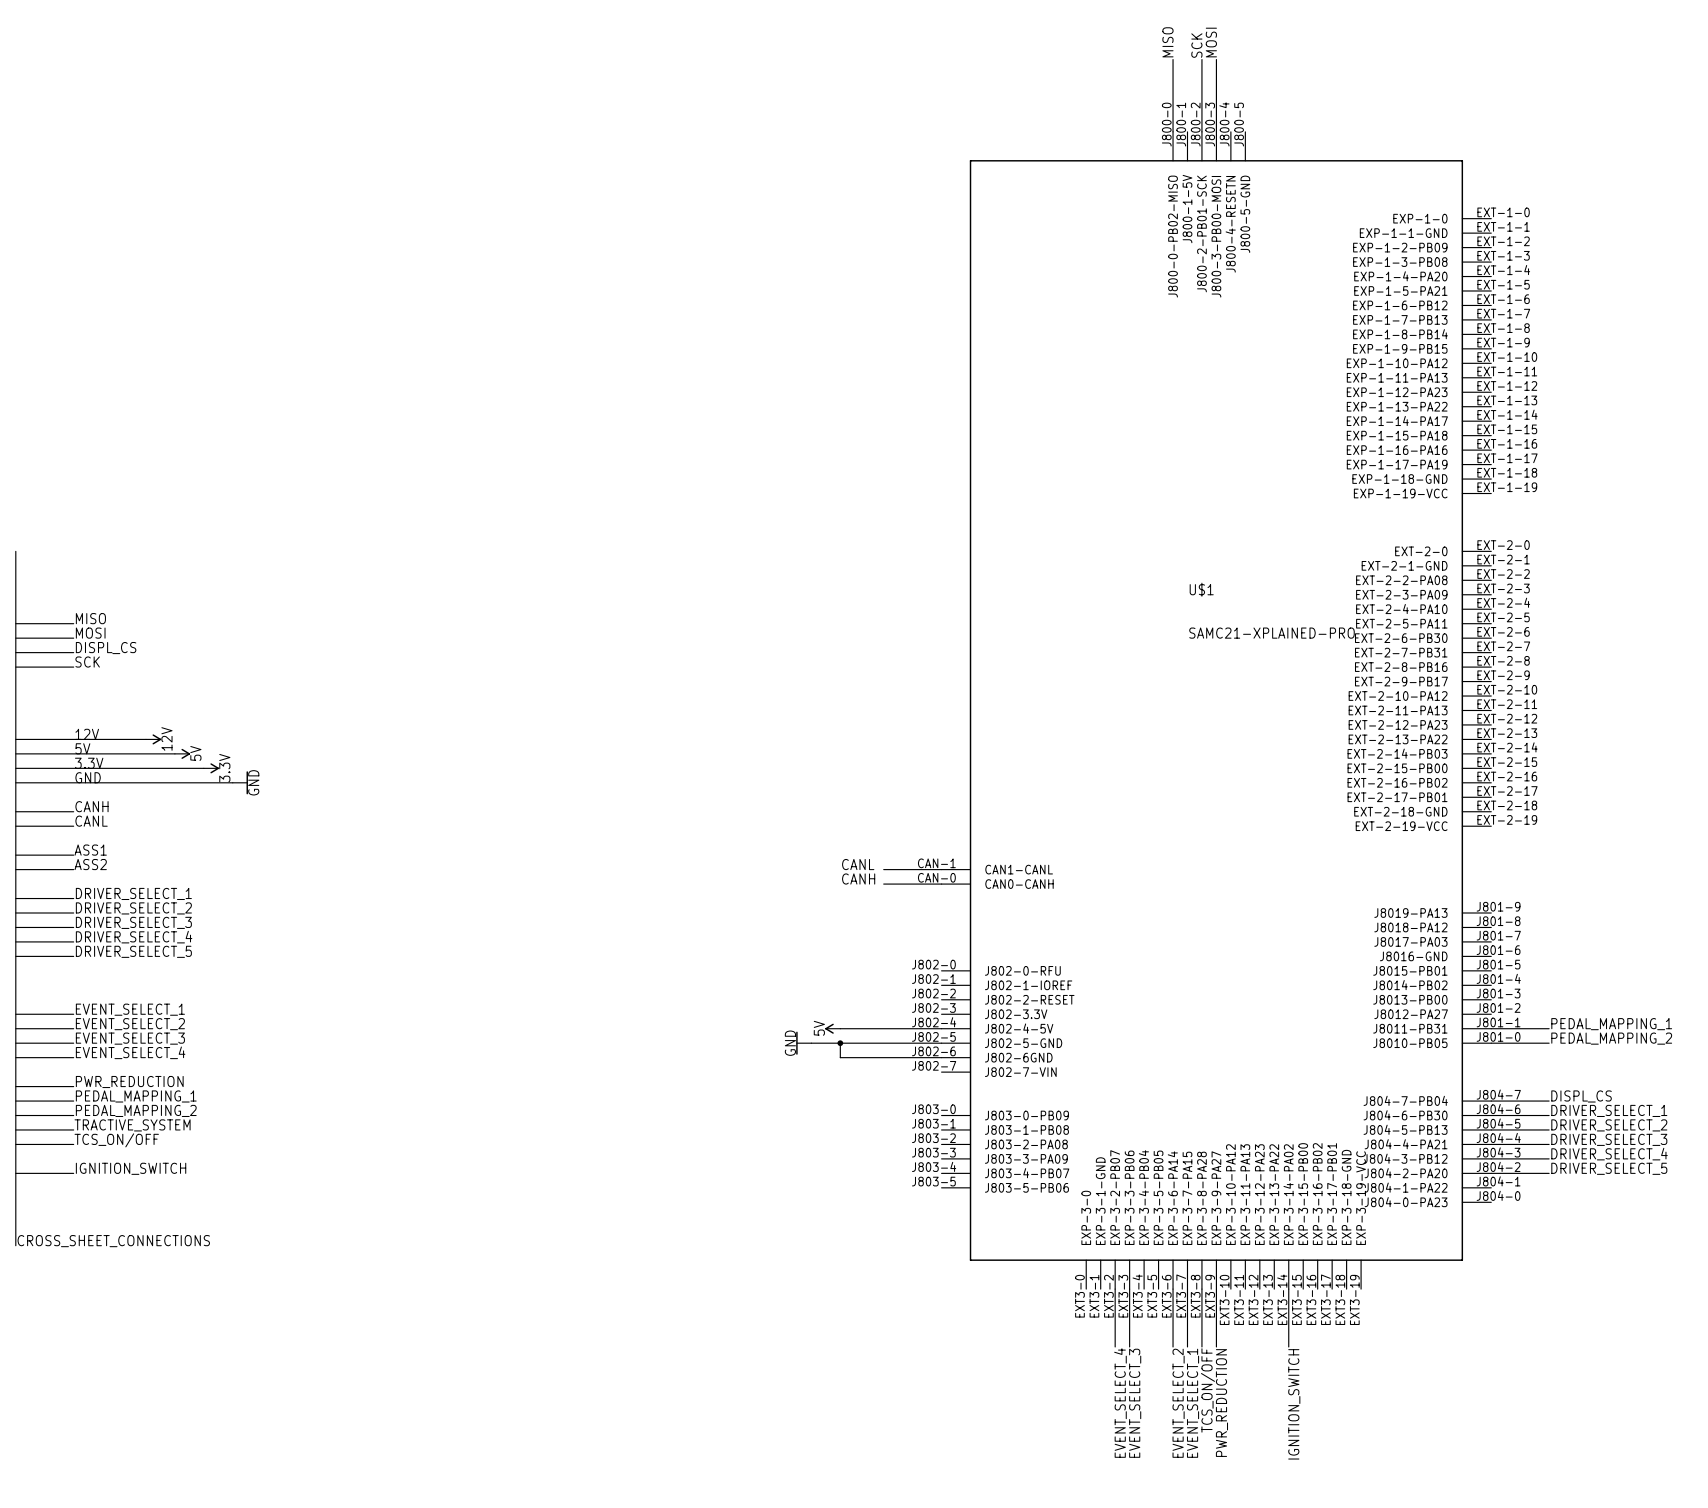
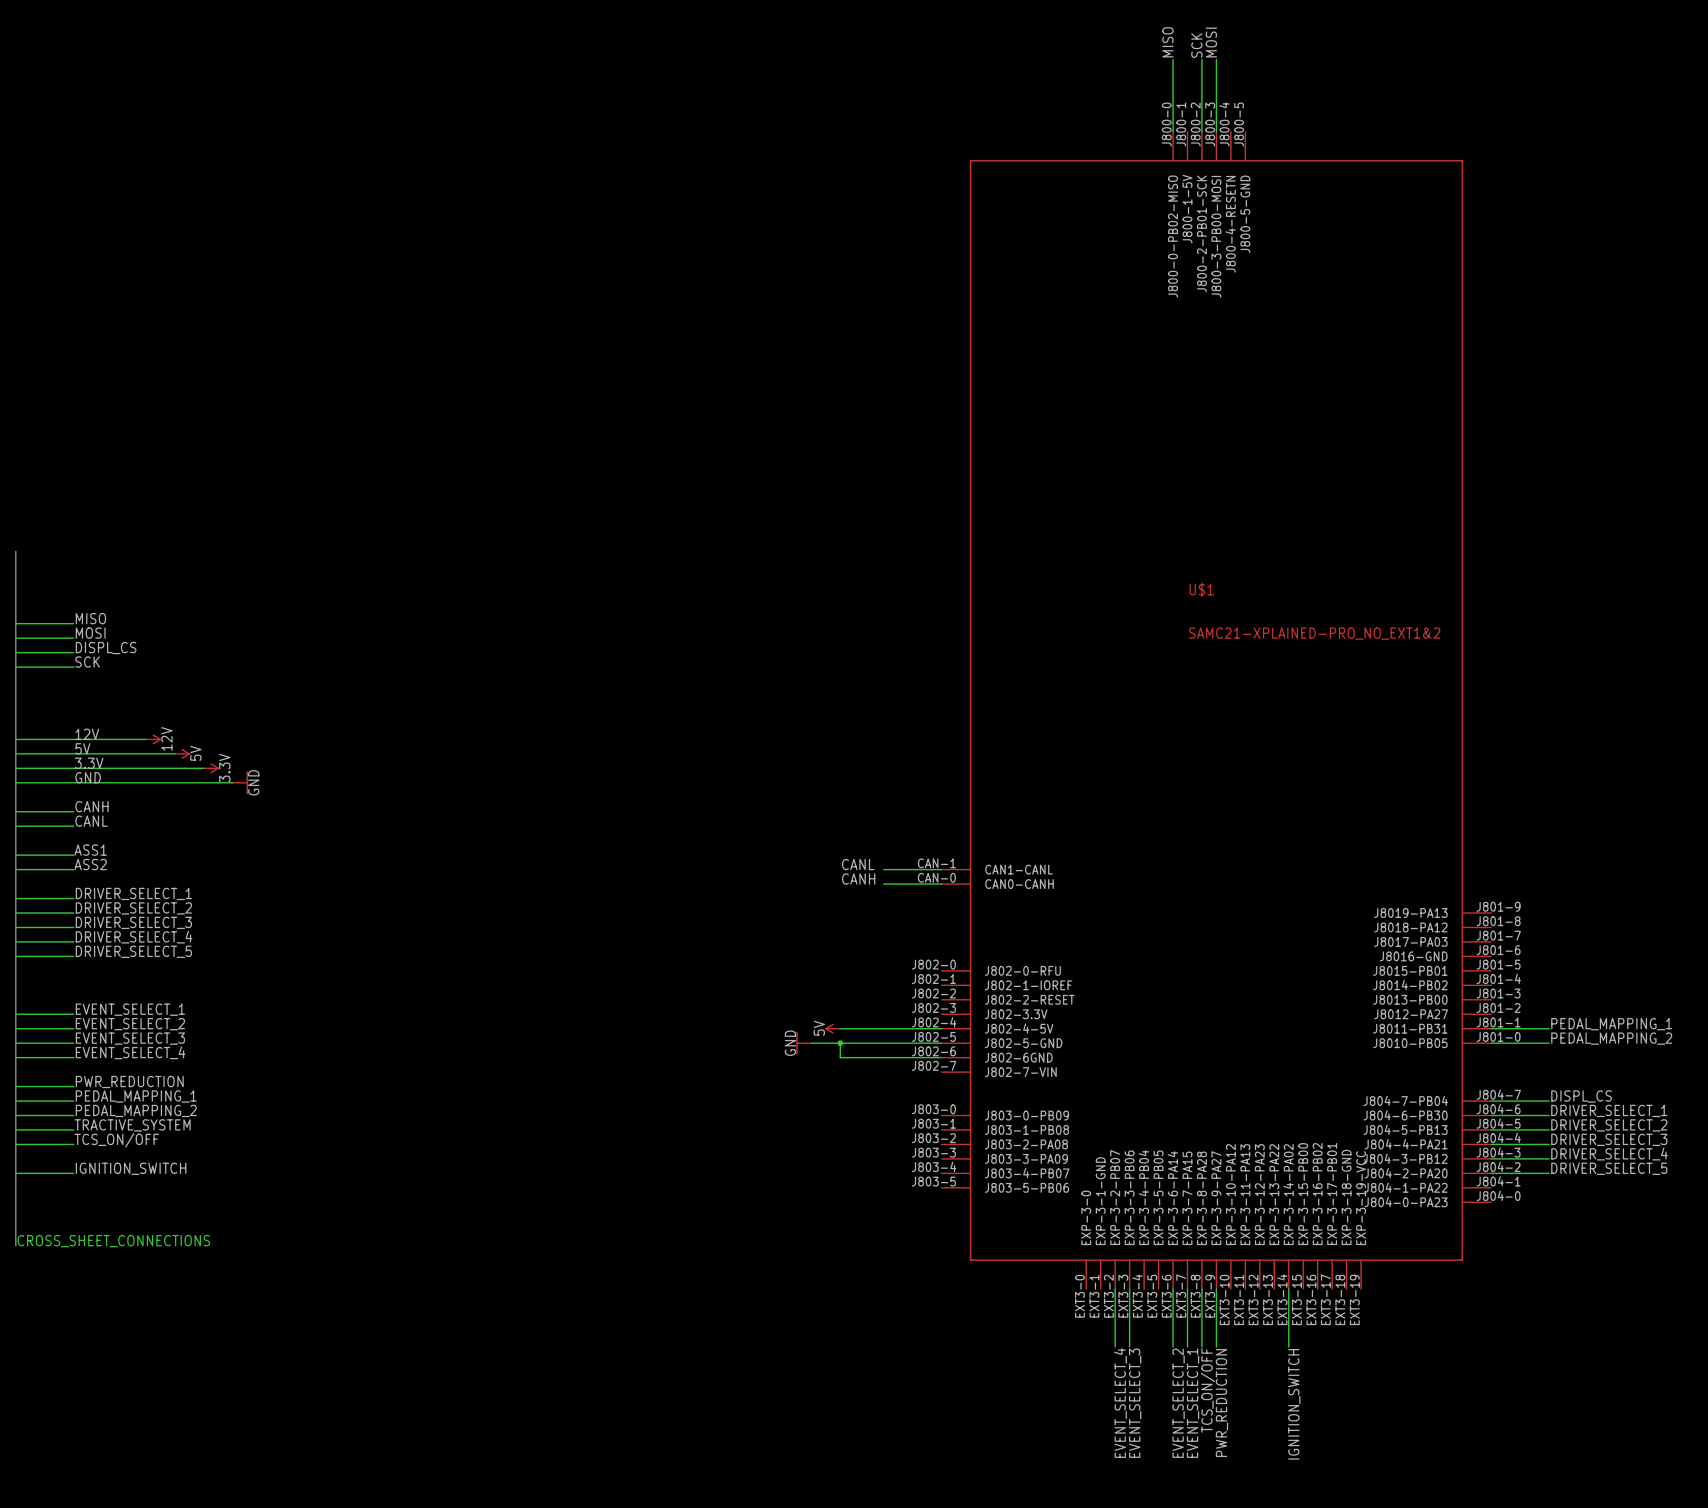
U$1 symbol: [941, 131, 1492, 1290] -> [941, 131, 1492, 1290]
U$1 value: SAMC21-XPLAINED-PRO (1271, 633) -> SAMC21-XPLAINED-PRO_NO_EXT1&2 (1314, 633)

